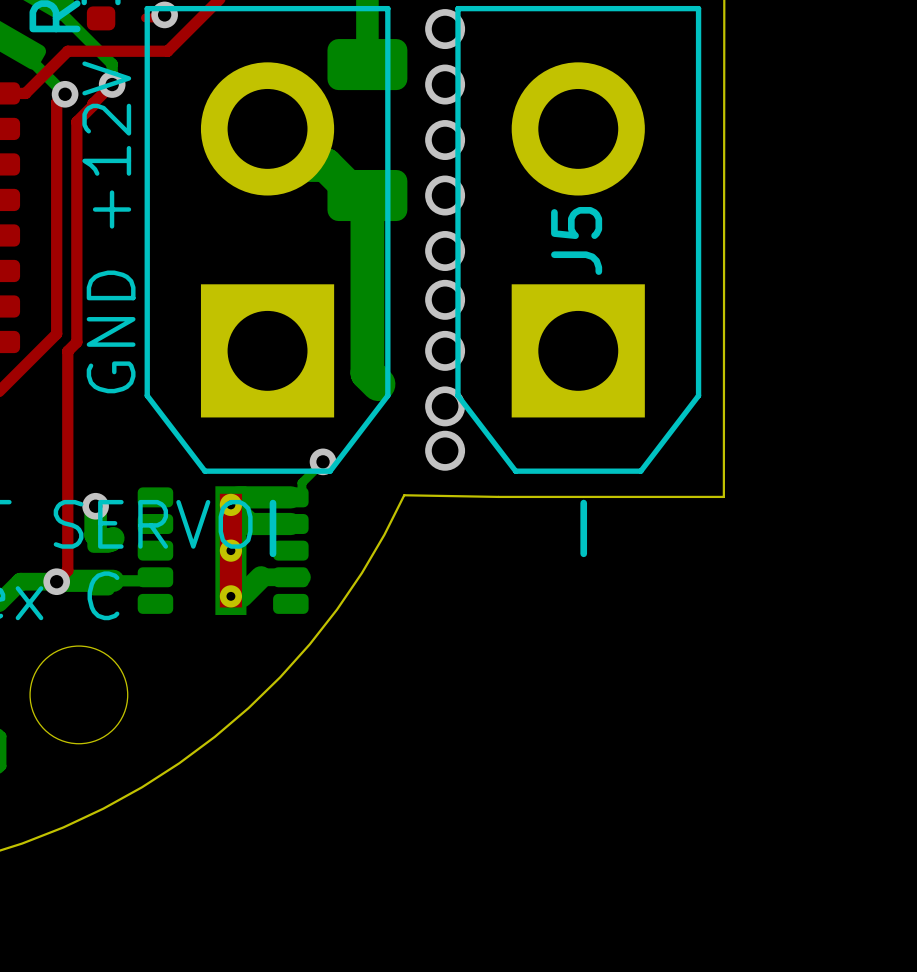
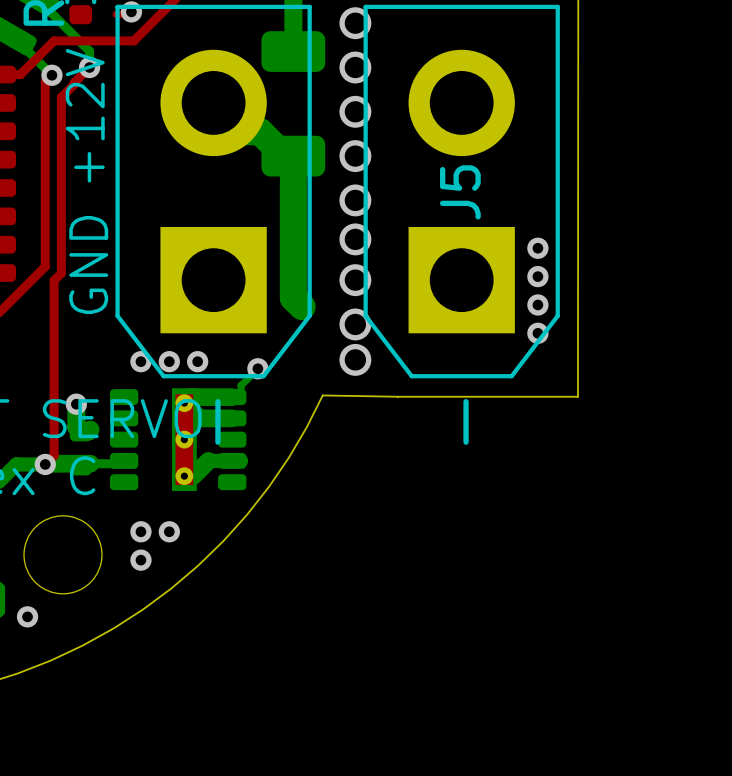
via: none -> (537, 248)
via: none -> (537, 276)
via: none -> (537, 304)
via: none -> (537, 333)
via: none -> (140, 361)
via: none -> (169, 361)
via: none -> (197, 361)
via: none -> (140, 531)
via: none -> (169, 531)
via: none -> (140, 560)
via: none -> (27, 616)

